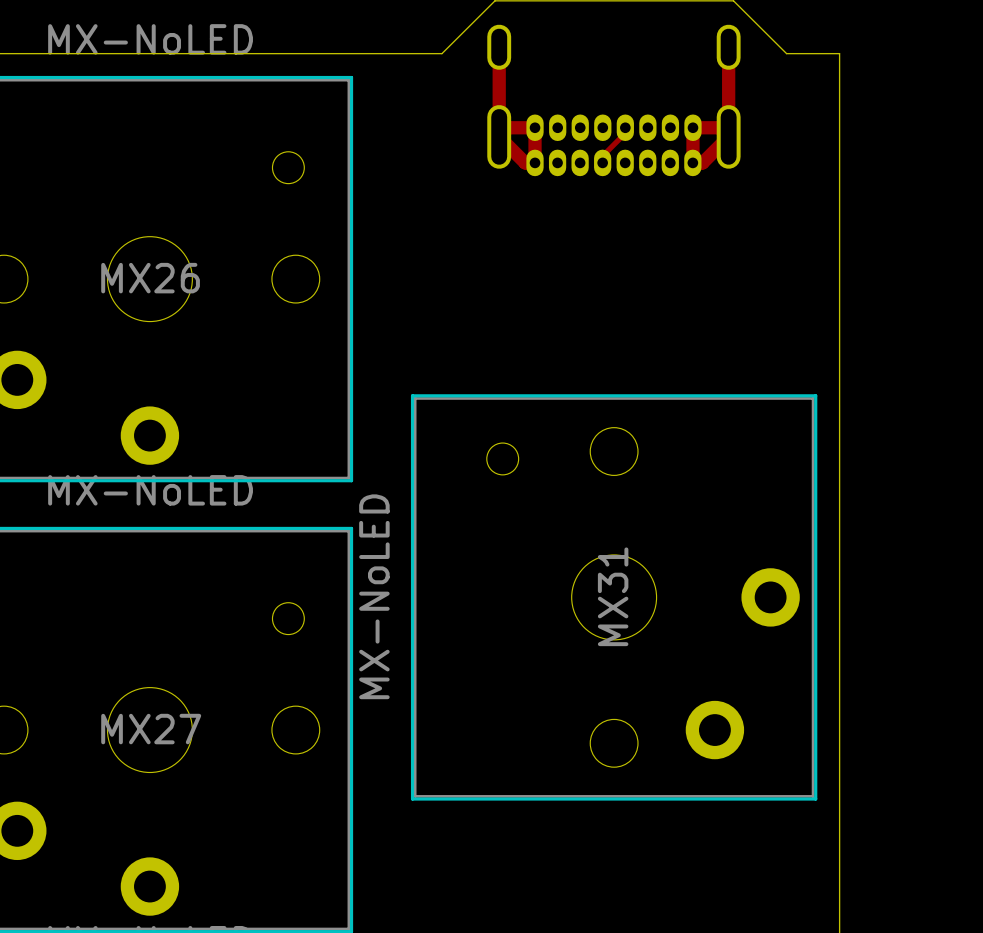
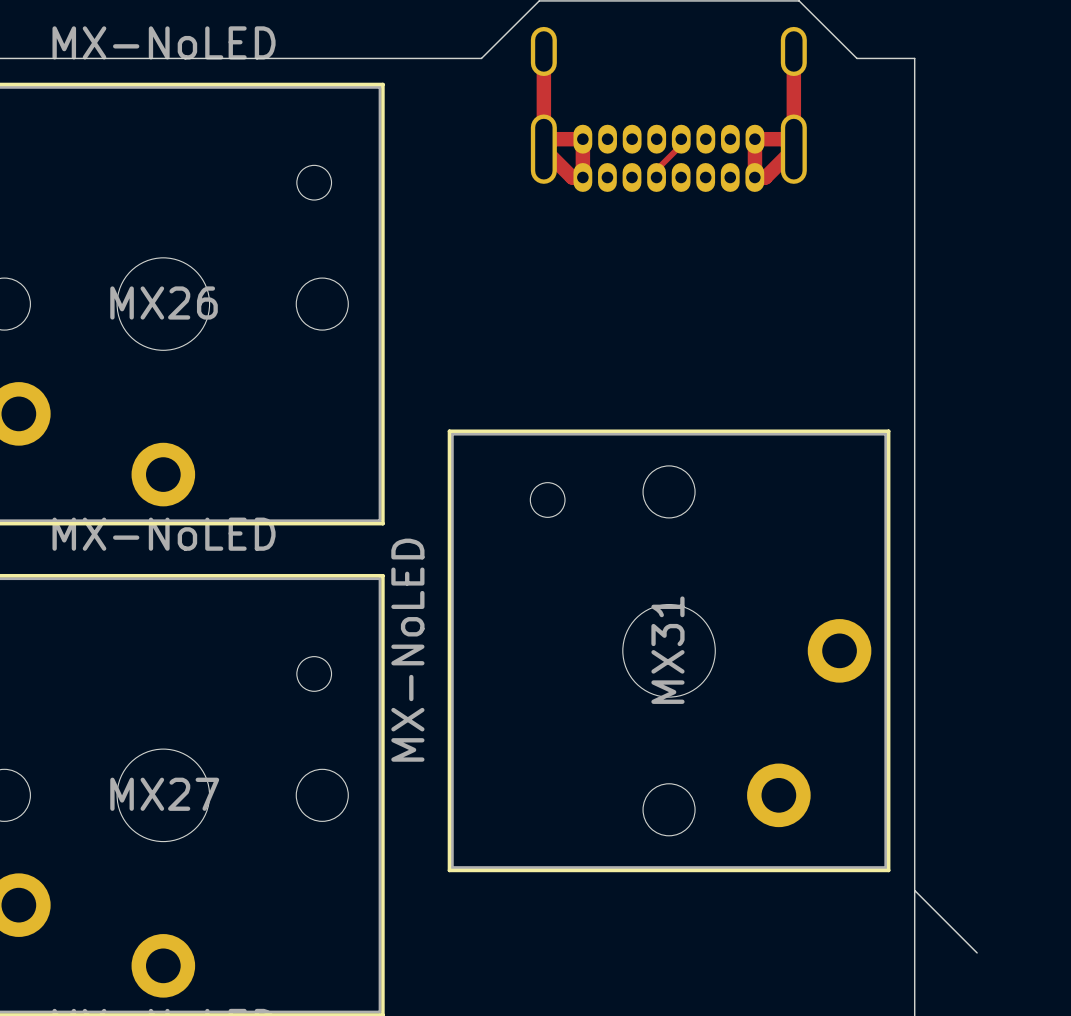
board edge: none -> (914, 890) (977, 952)

